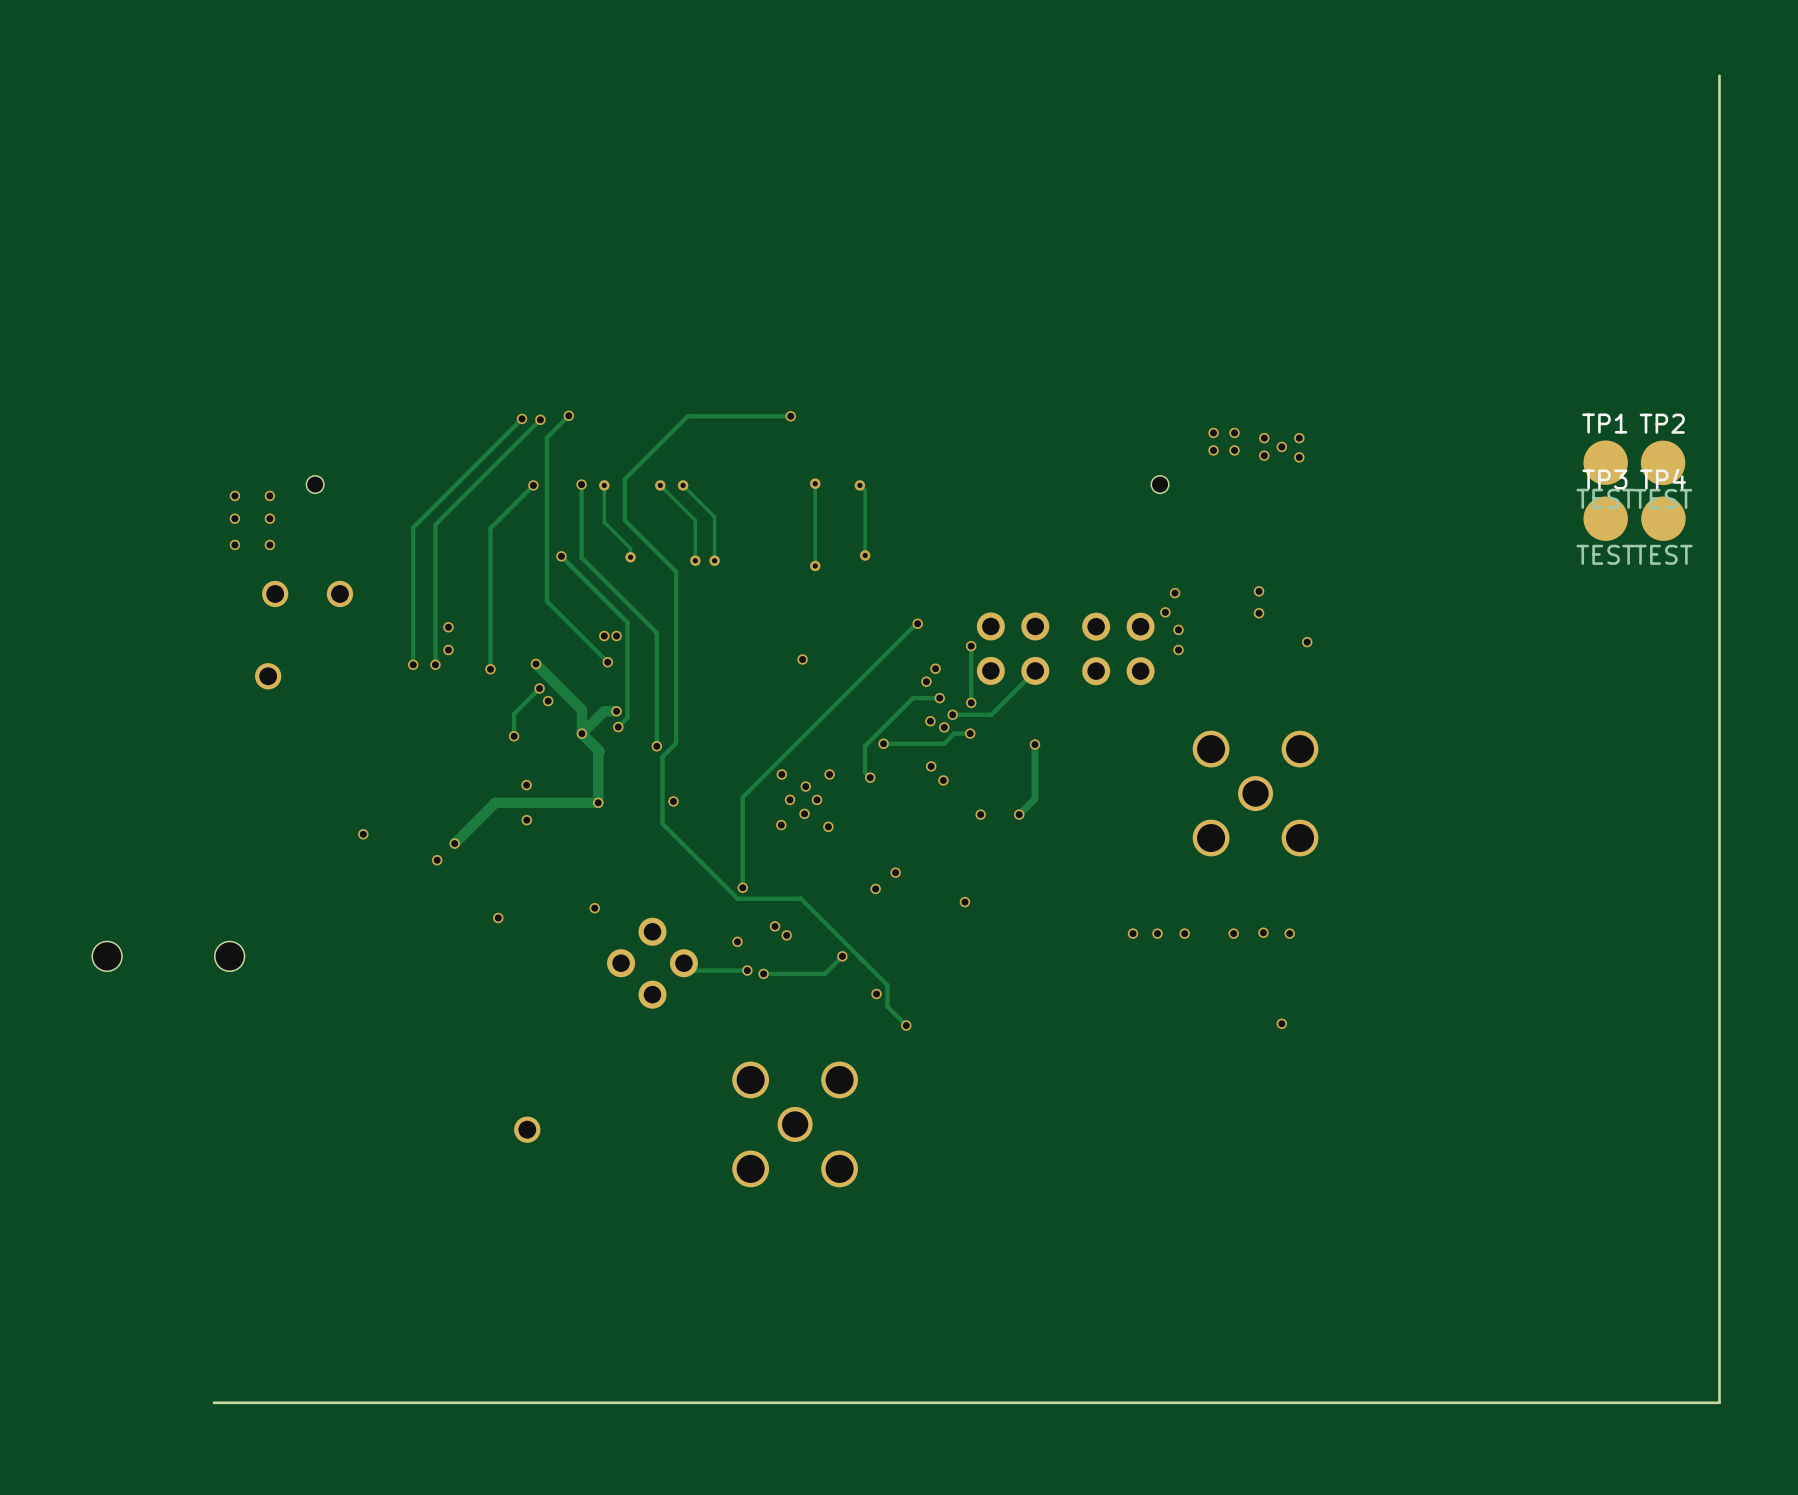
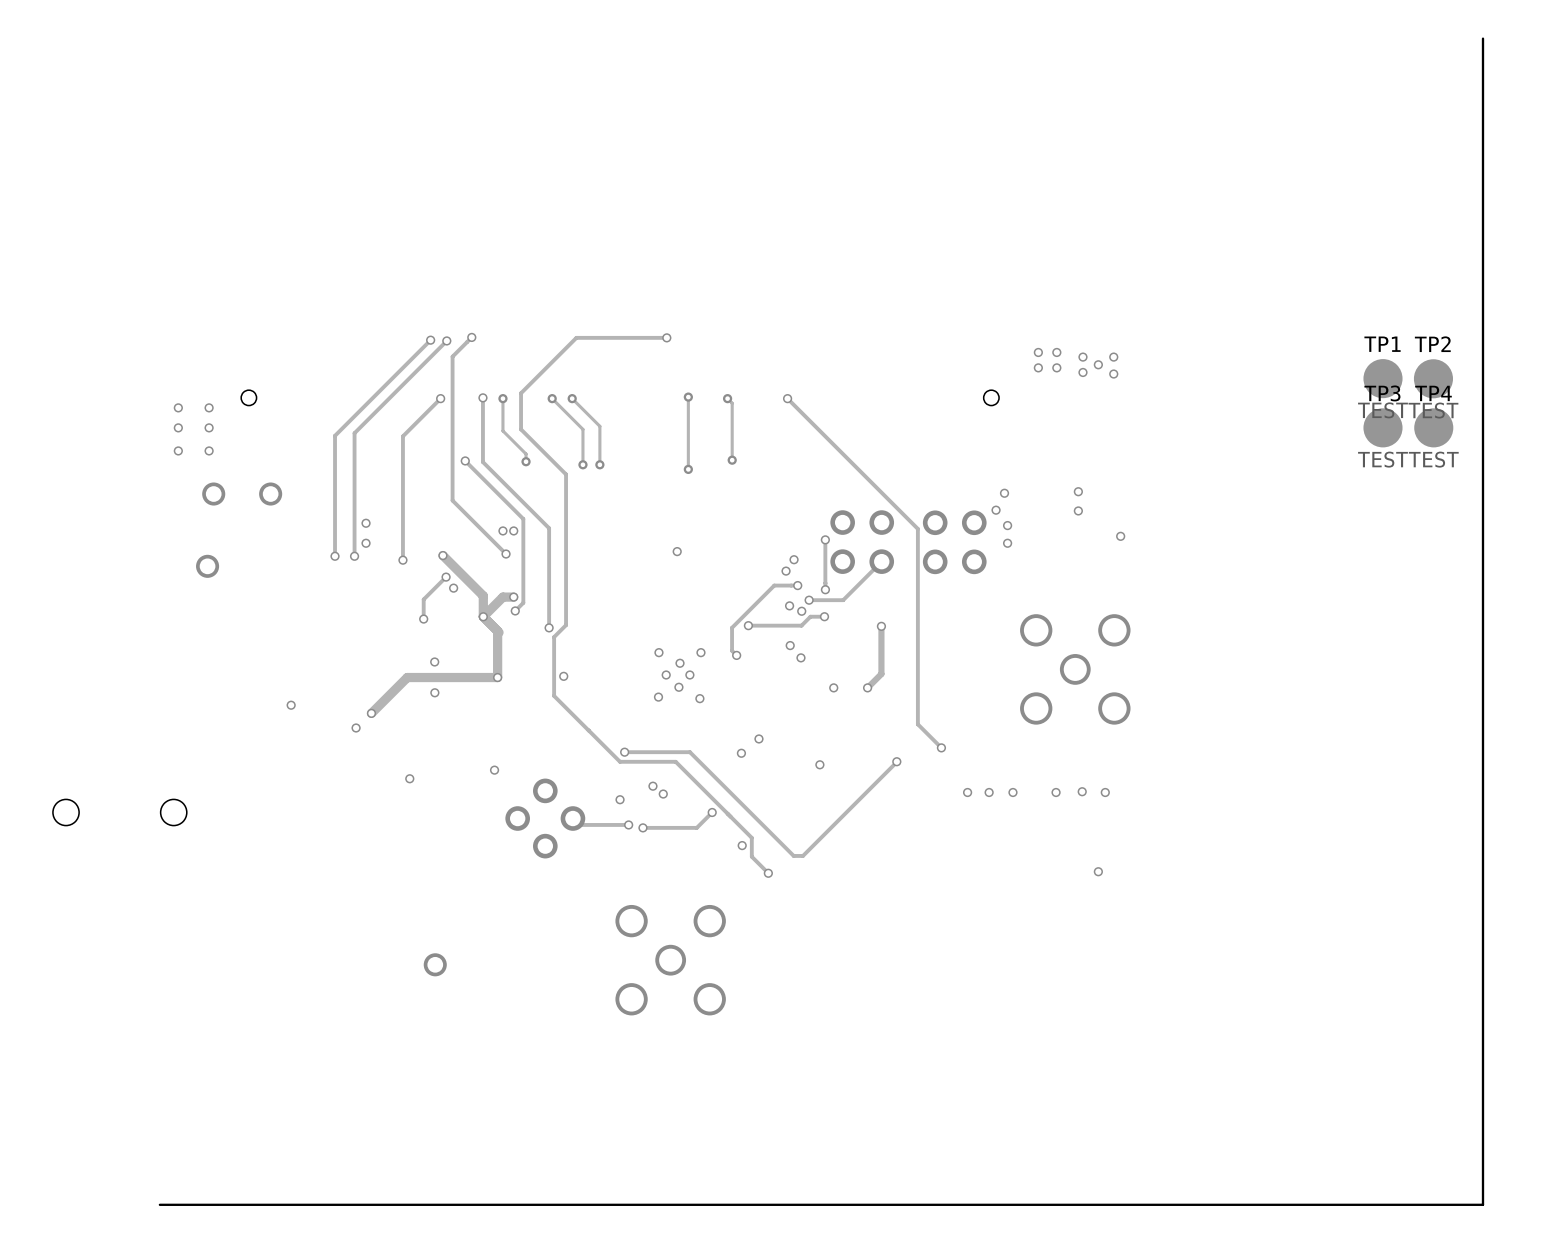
track: none -> (787, 398) (917, 528) (917, 724) (941, 747)
via: none -> (787, 398)
track: (917, 623) (742, 797) (742, 887) -> (896, 761) (802, 855) (793, 855) (689, 752) (624, 752)
via: (917, 623) -> none
via: none -> (941, 747)
via: none -> (896, 761)

